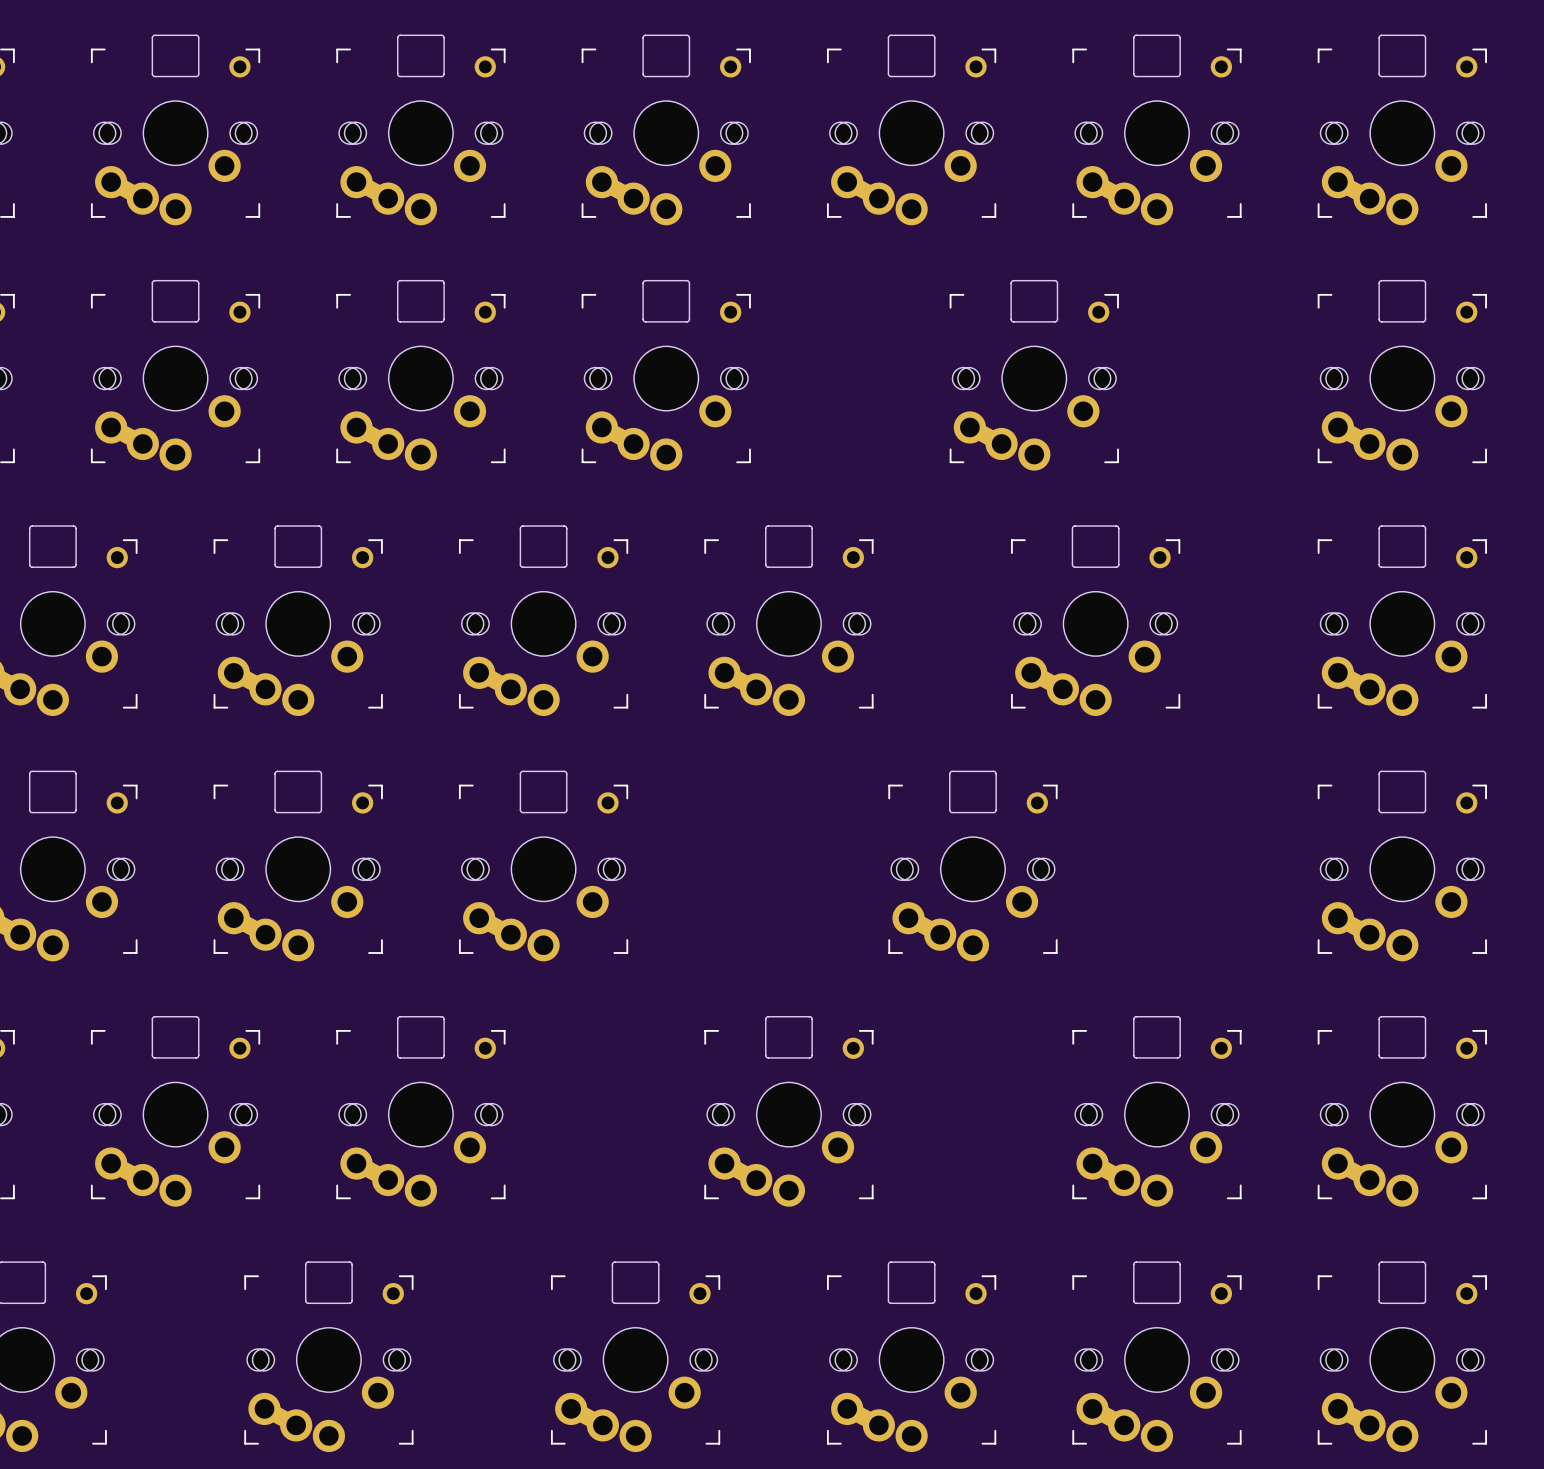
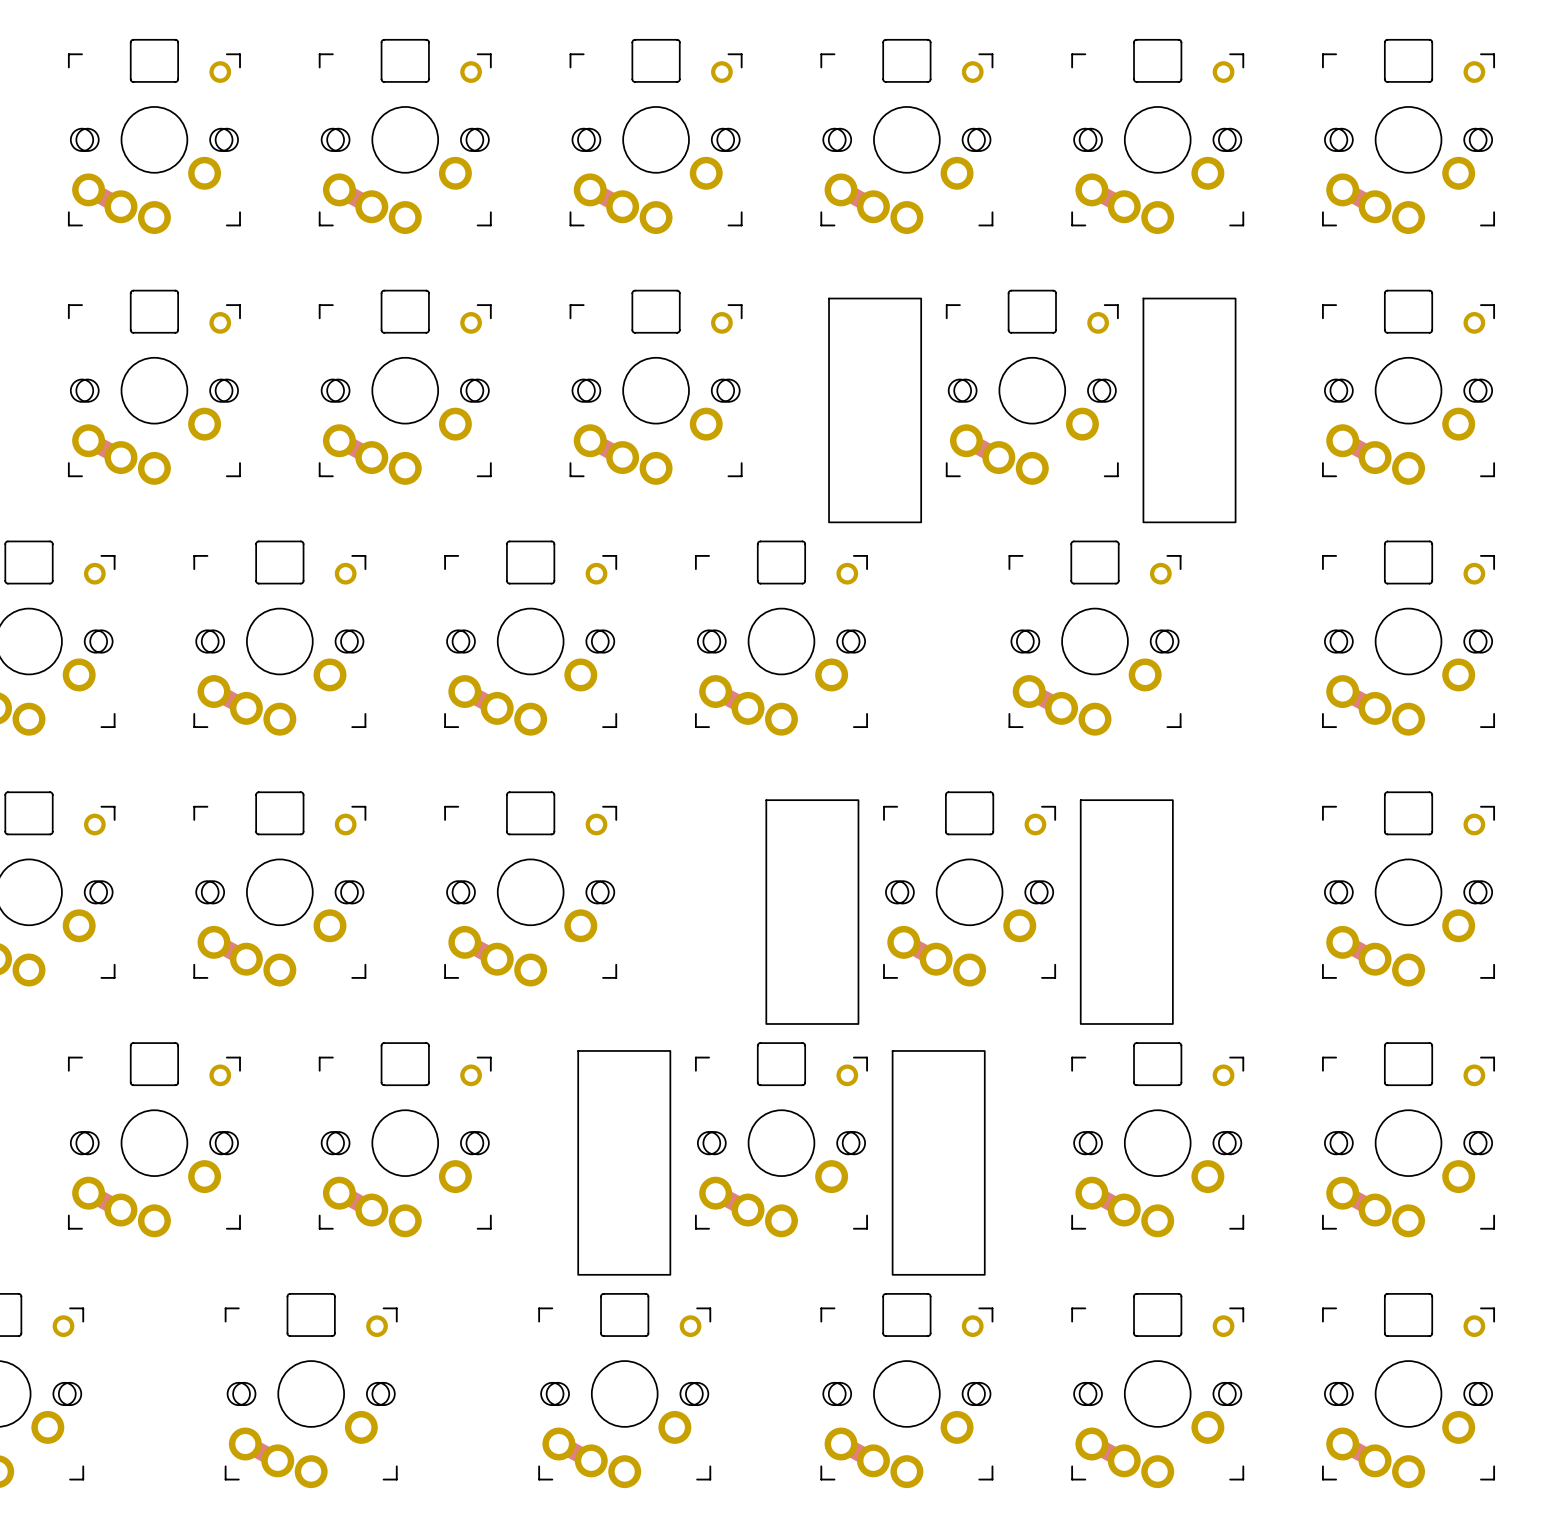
drawing: none -> [828, 297, 1237, 524]
drawing: none -> [765, 799, 1174, 1025]
drawing: none -> [577, 1050, 986, 1276]

